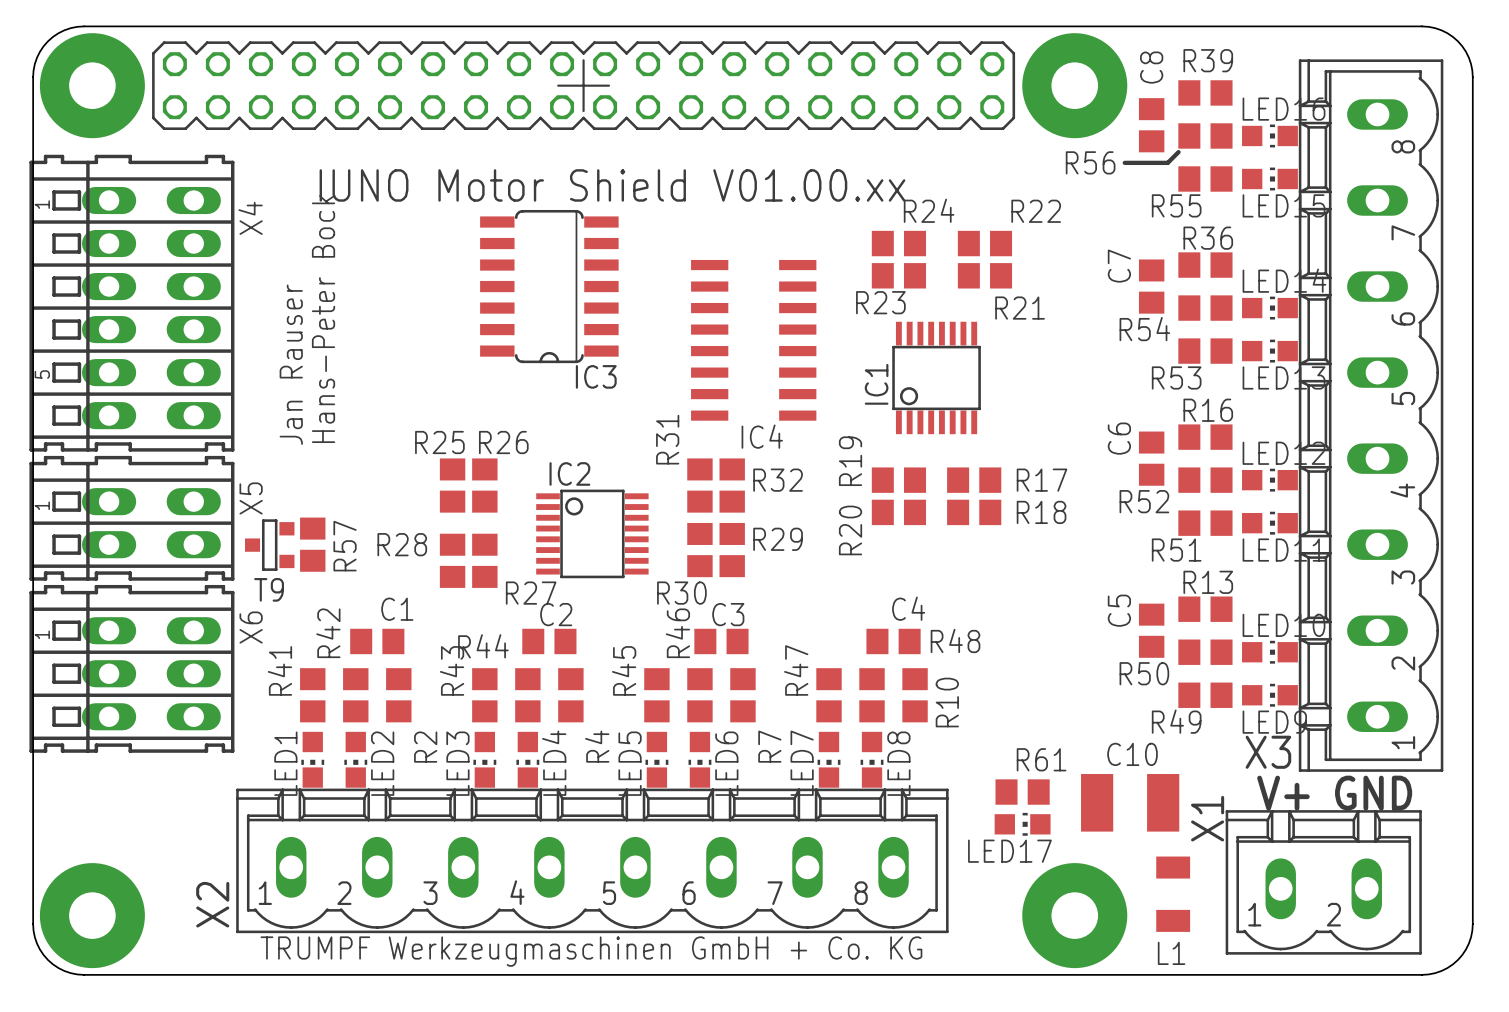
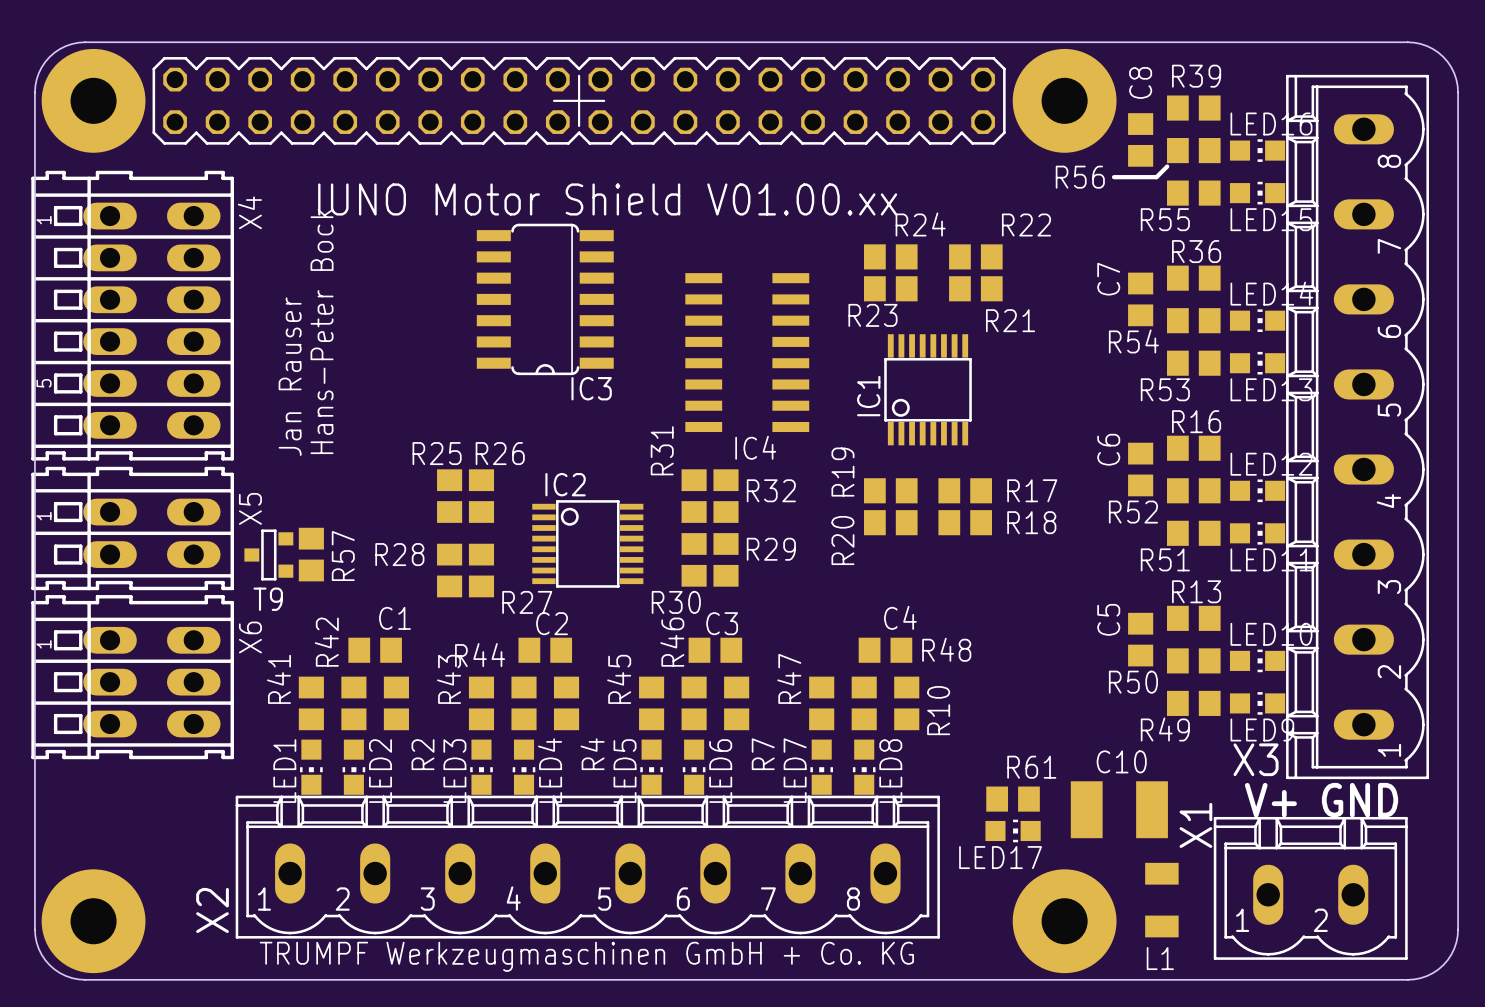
X4 footprint: [29, 154, 235, 452] -> [31, 170, 234, 461]
X6 footprint: [29, 584, 235, 753] -> [31, 595, 234, 760]

